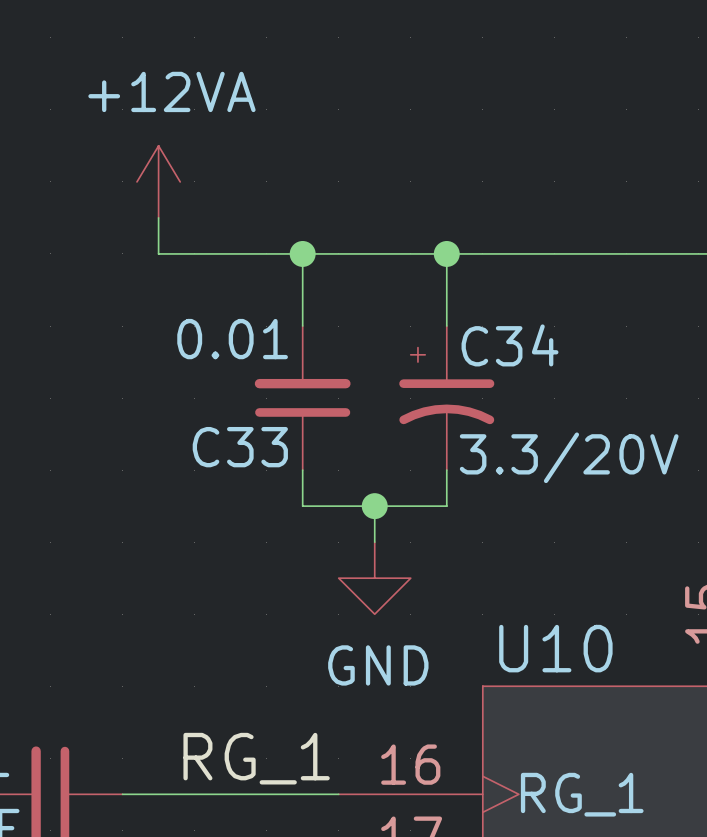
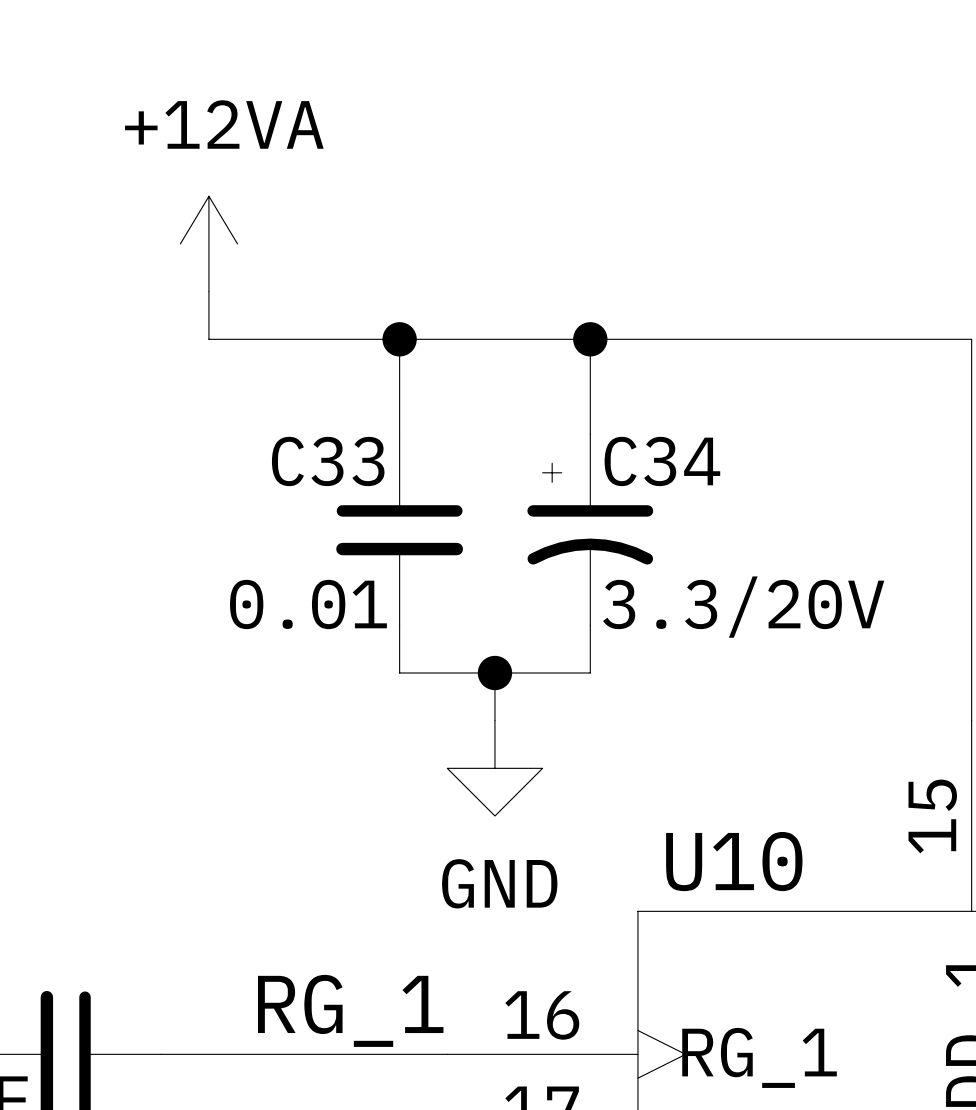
C33 value position: 0.01 (232, 339) -> 0.01 (308, 604)
C33 rotation: 0° (302, 397) -> 180° (399, 530)
C33 name position: C33 (240, 447) -> C33 (328, 461)

